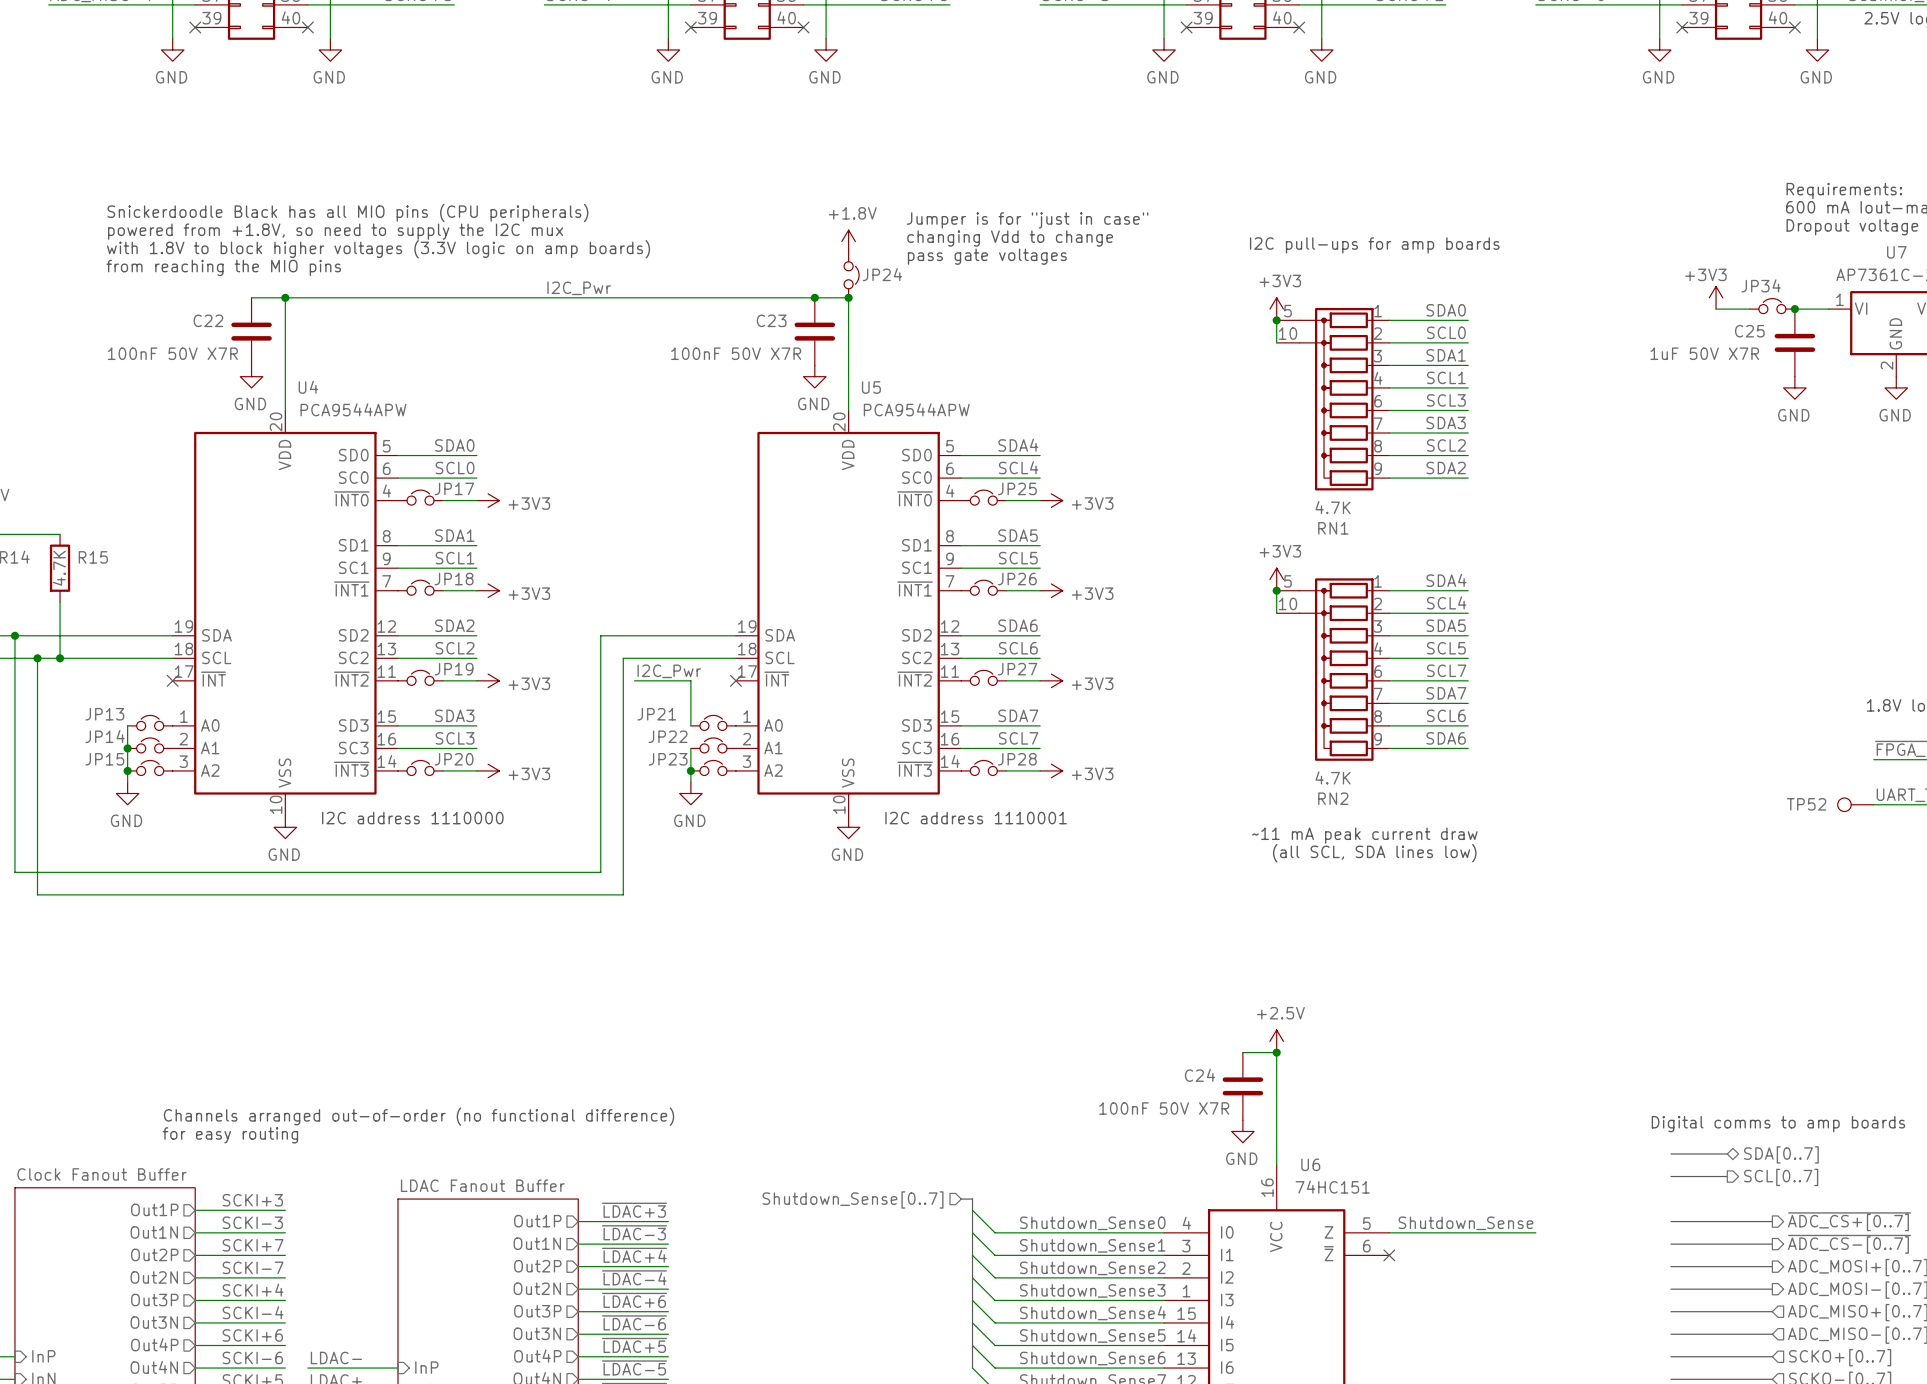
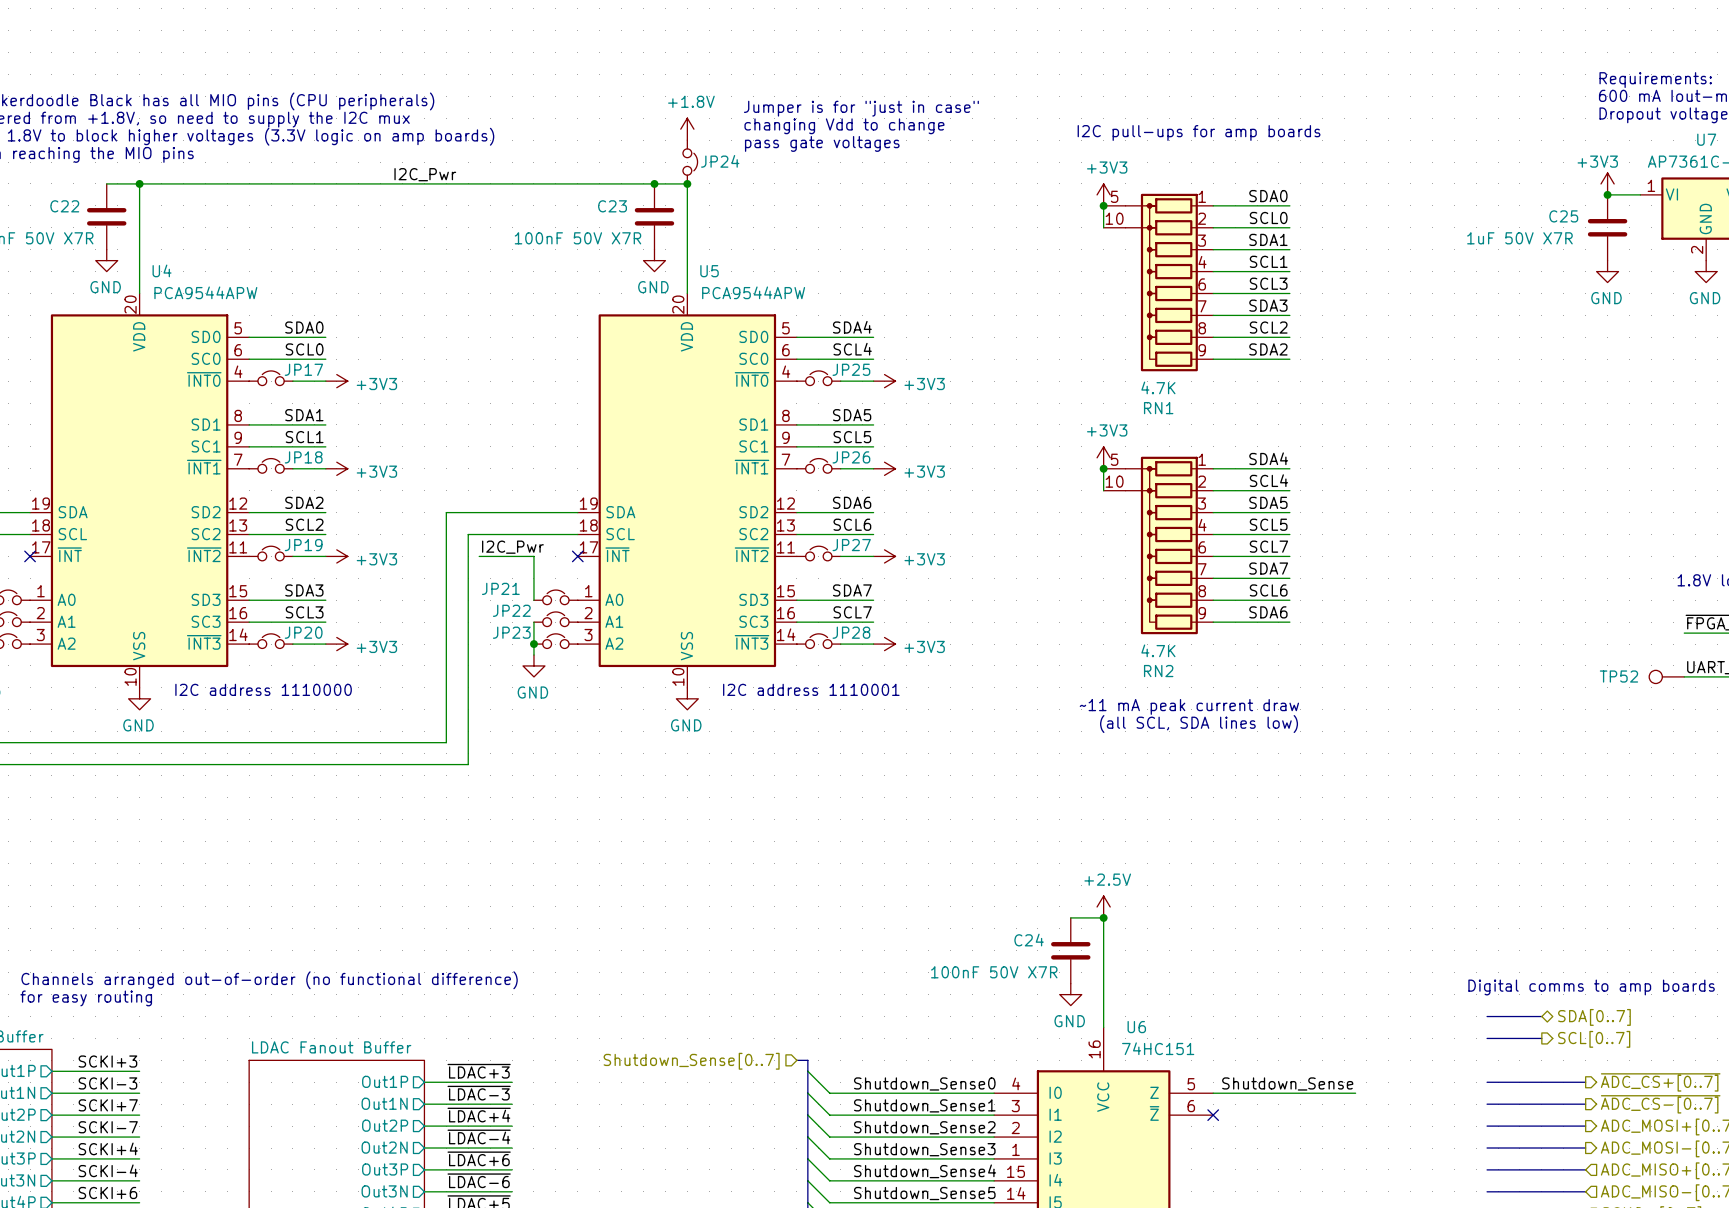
power symbol position: +3V3 (1716, 297) -> +3V3 (1607, 183)
JP34: (1772, 306) -> none
wire: (1716, 309) (1749, 309) -> none

